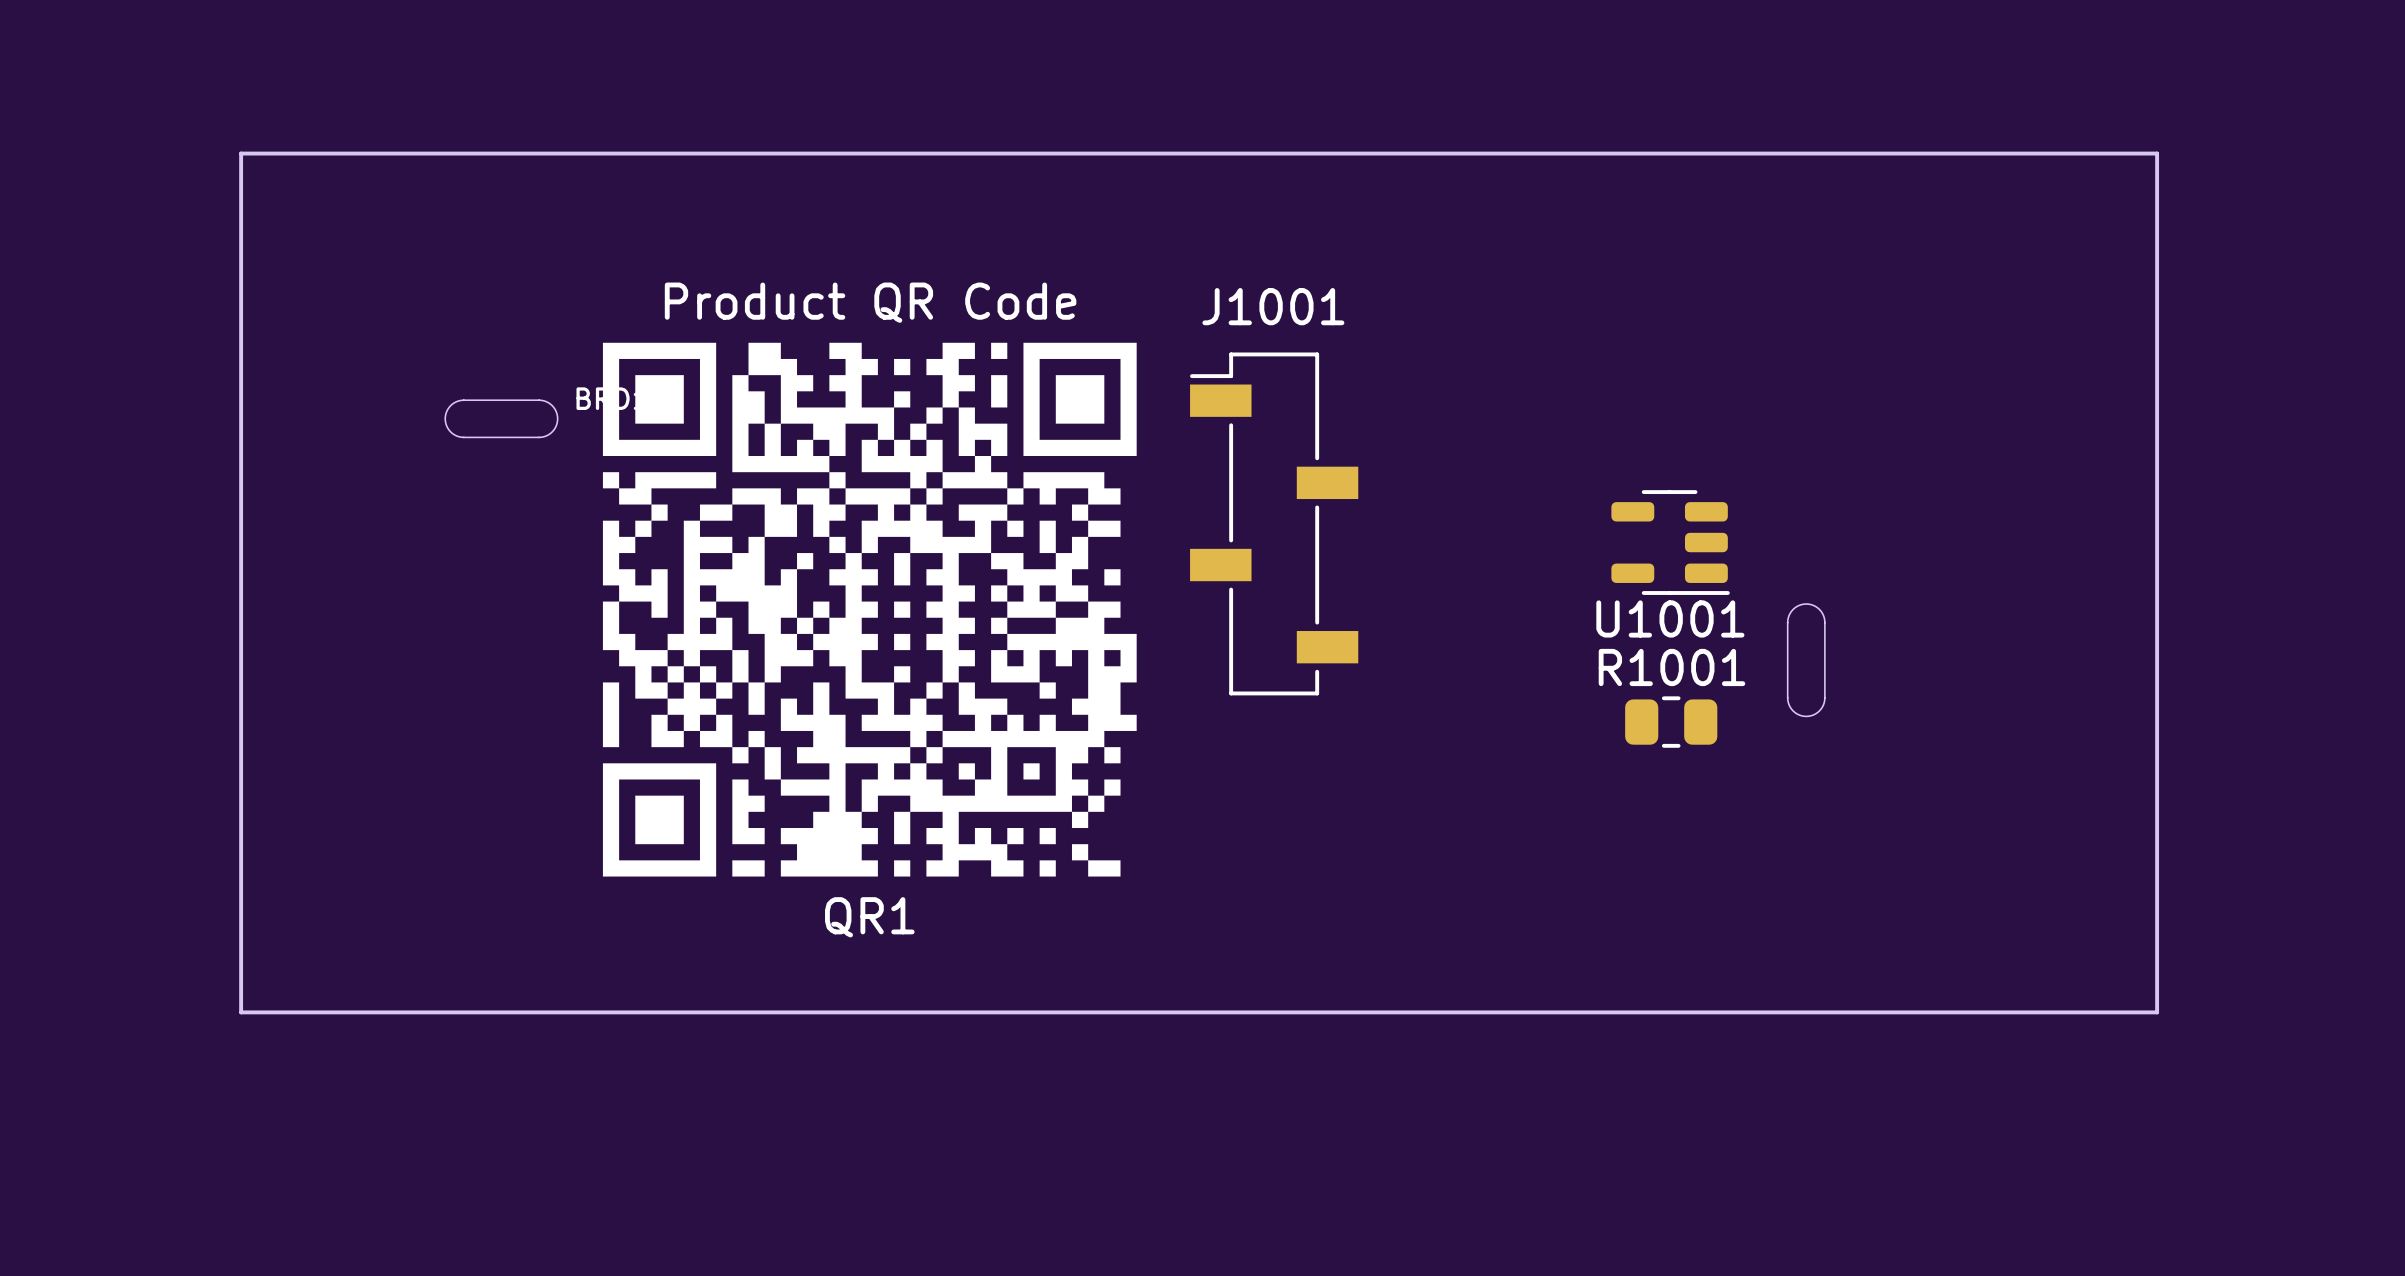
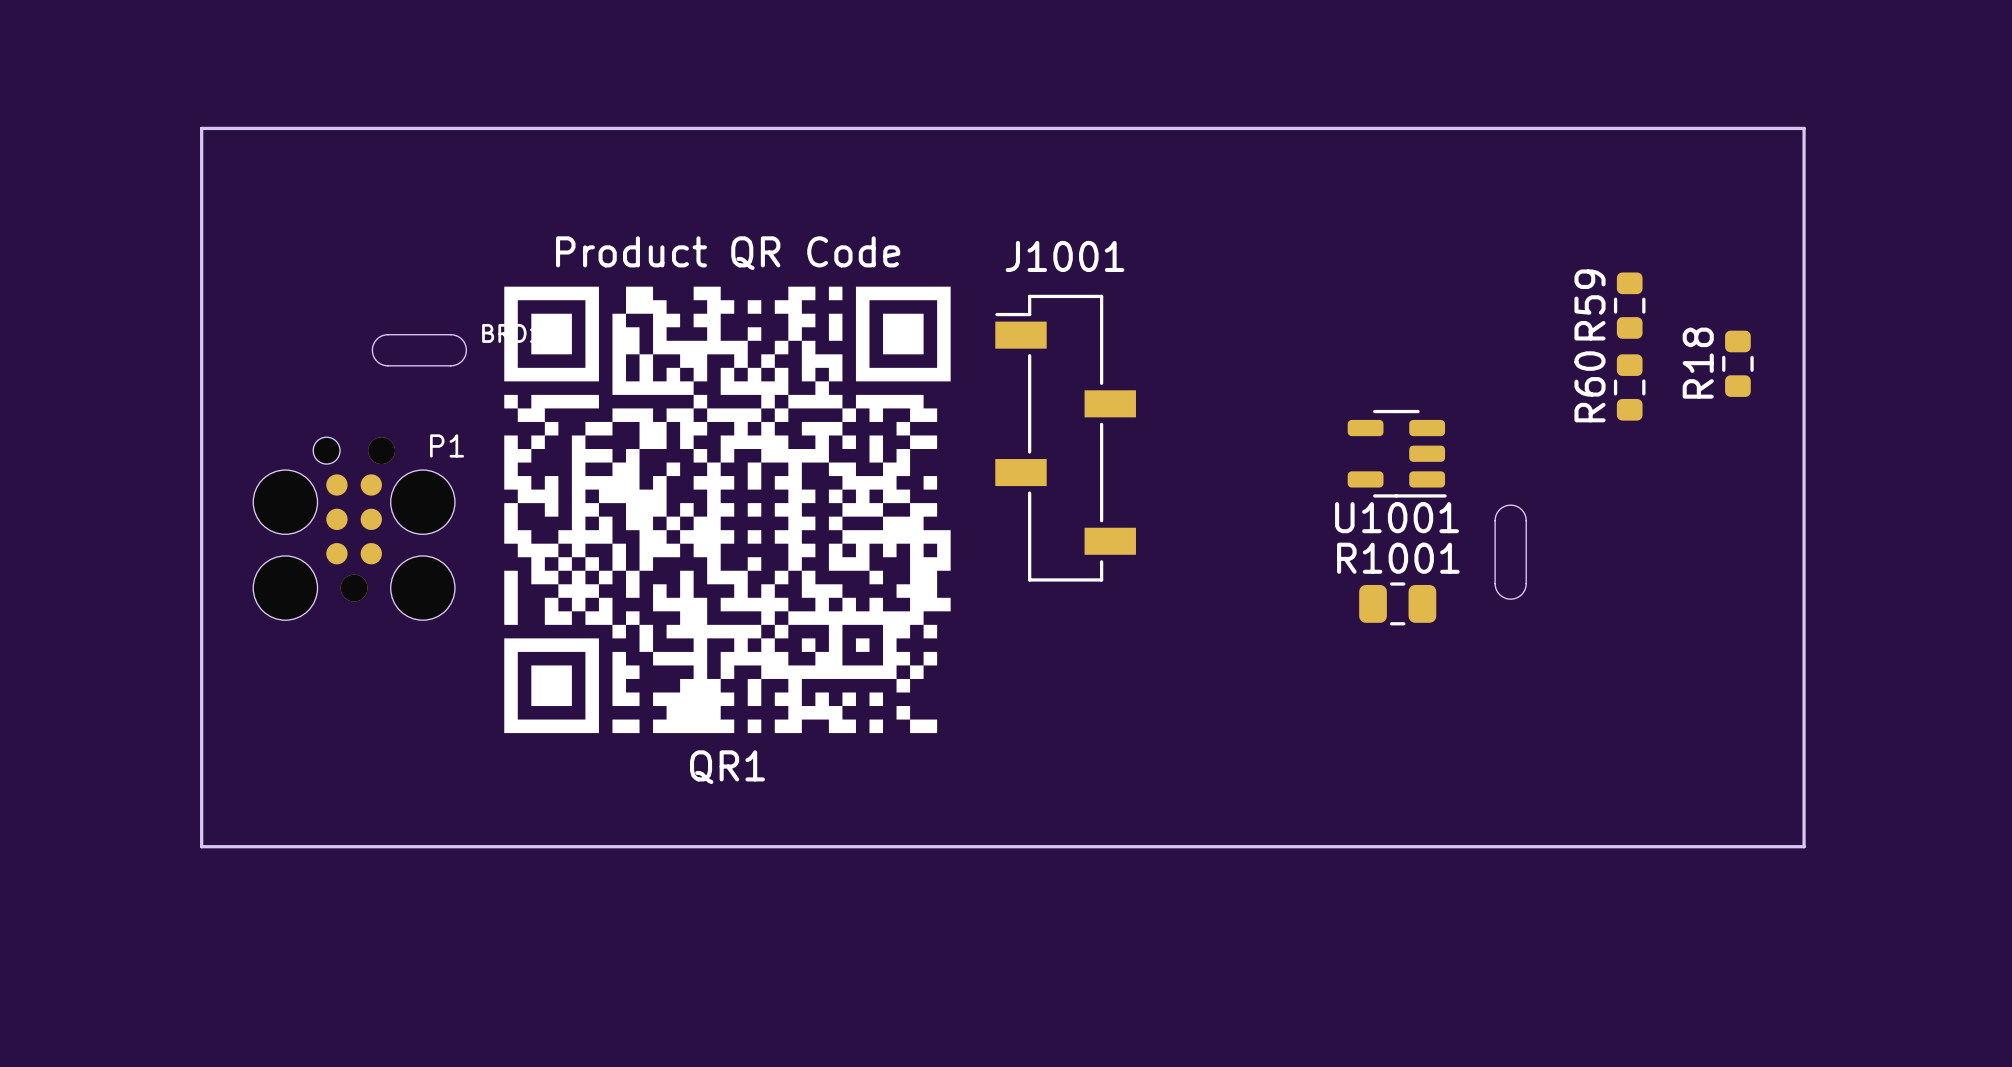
R59: none -> (1629, 305)
R18: none -> (1737, 363)
R60: none -> (1629, 387)
P1: none -> (354, 528)

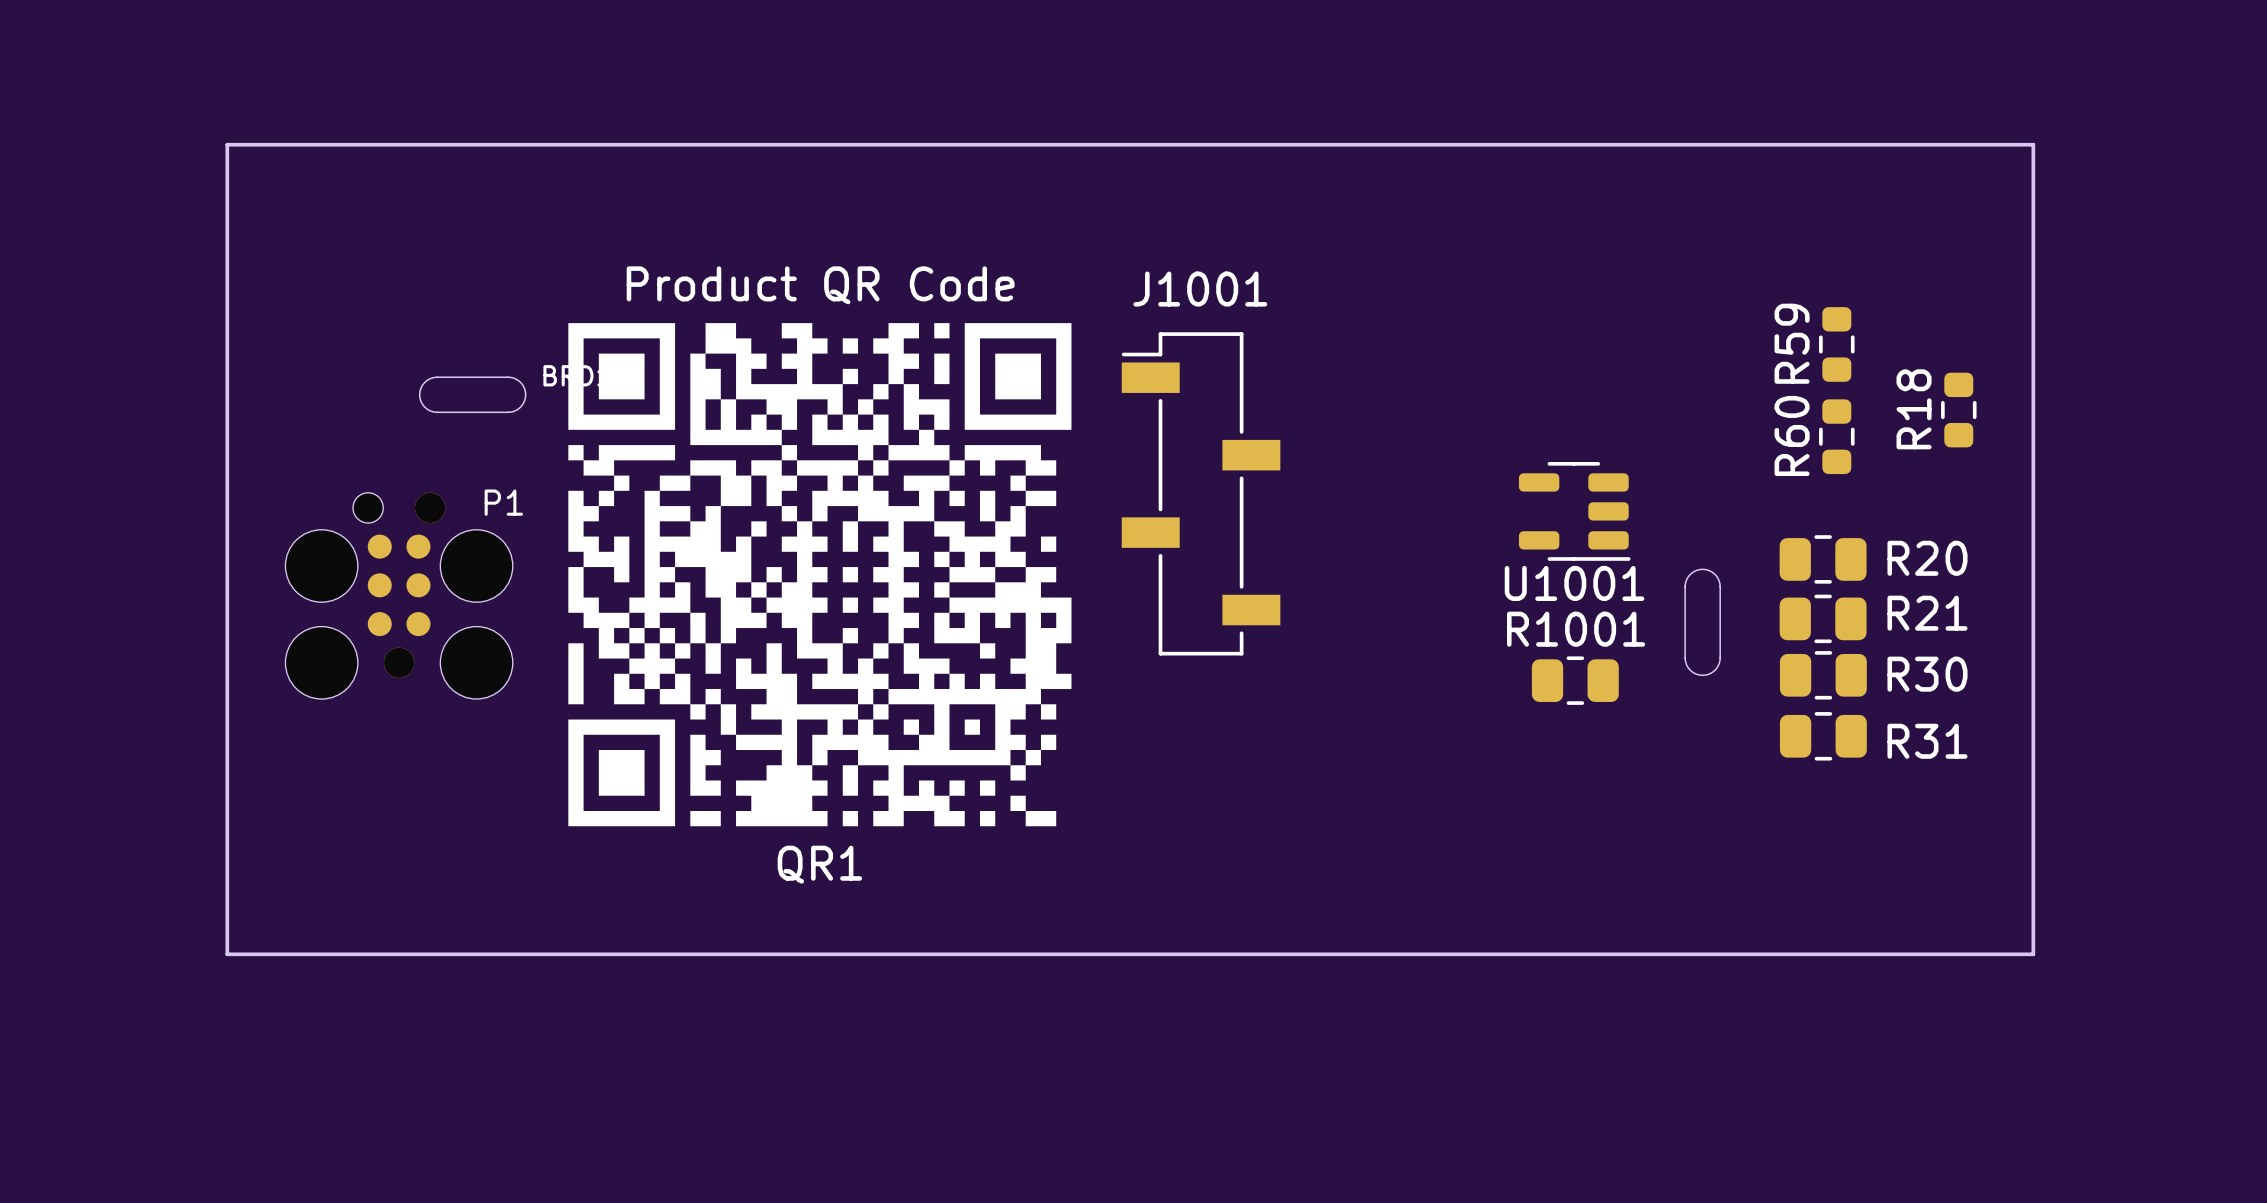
R20: none -> (1823, 559)
R21: none -> (1823, 618)
R30: none -> (1823, 675)
R31: none -> (1823, 736)

